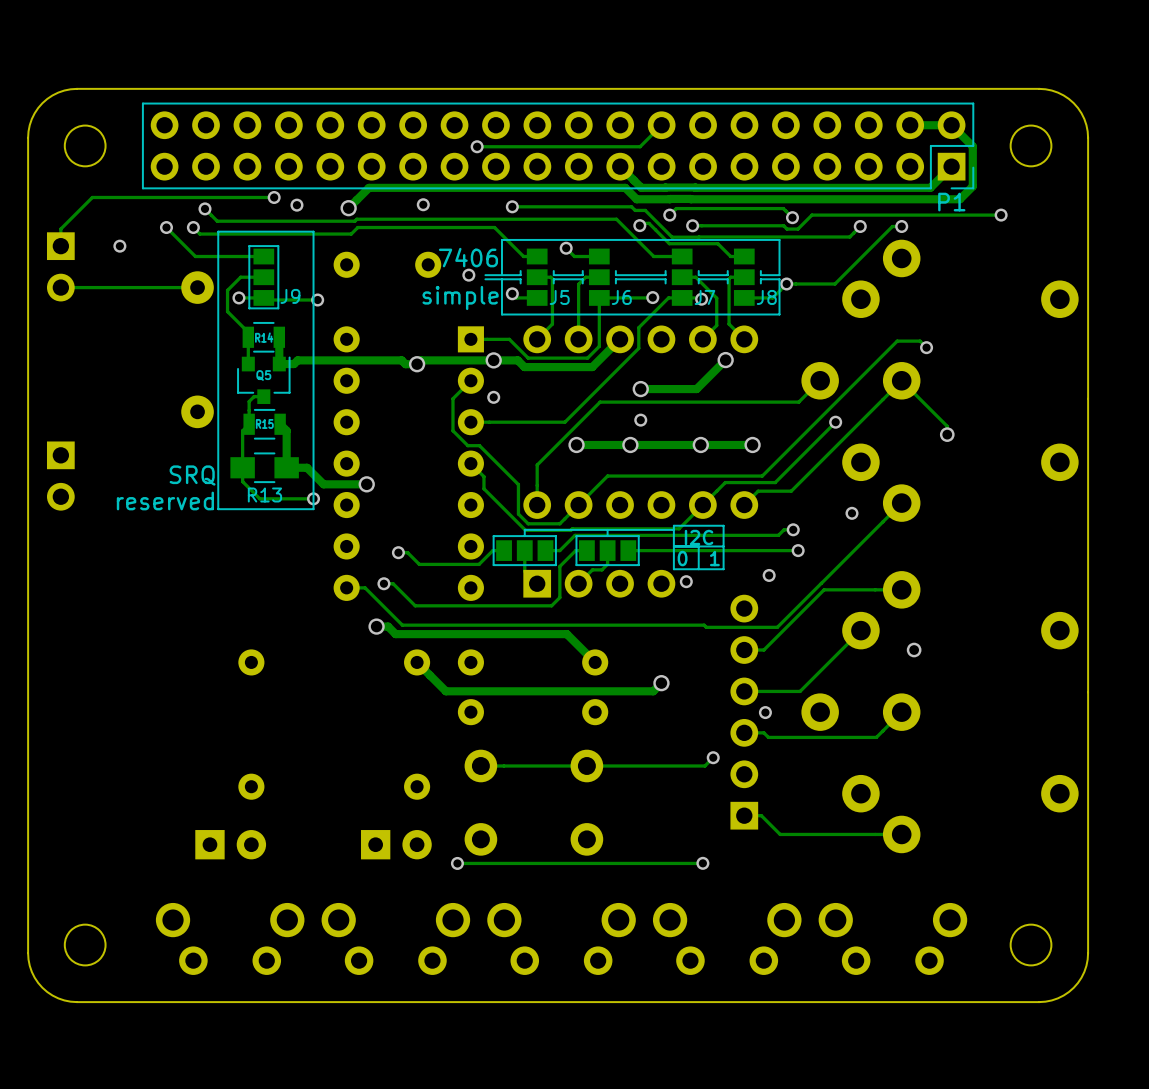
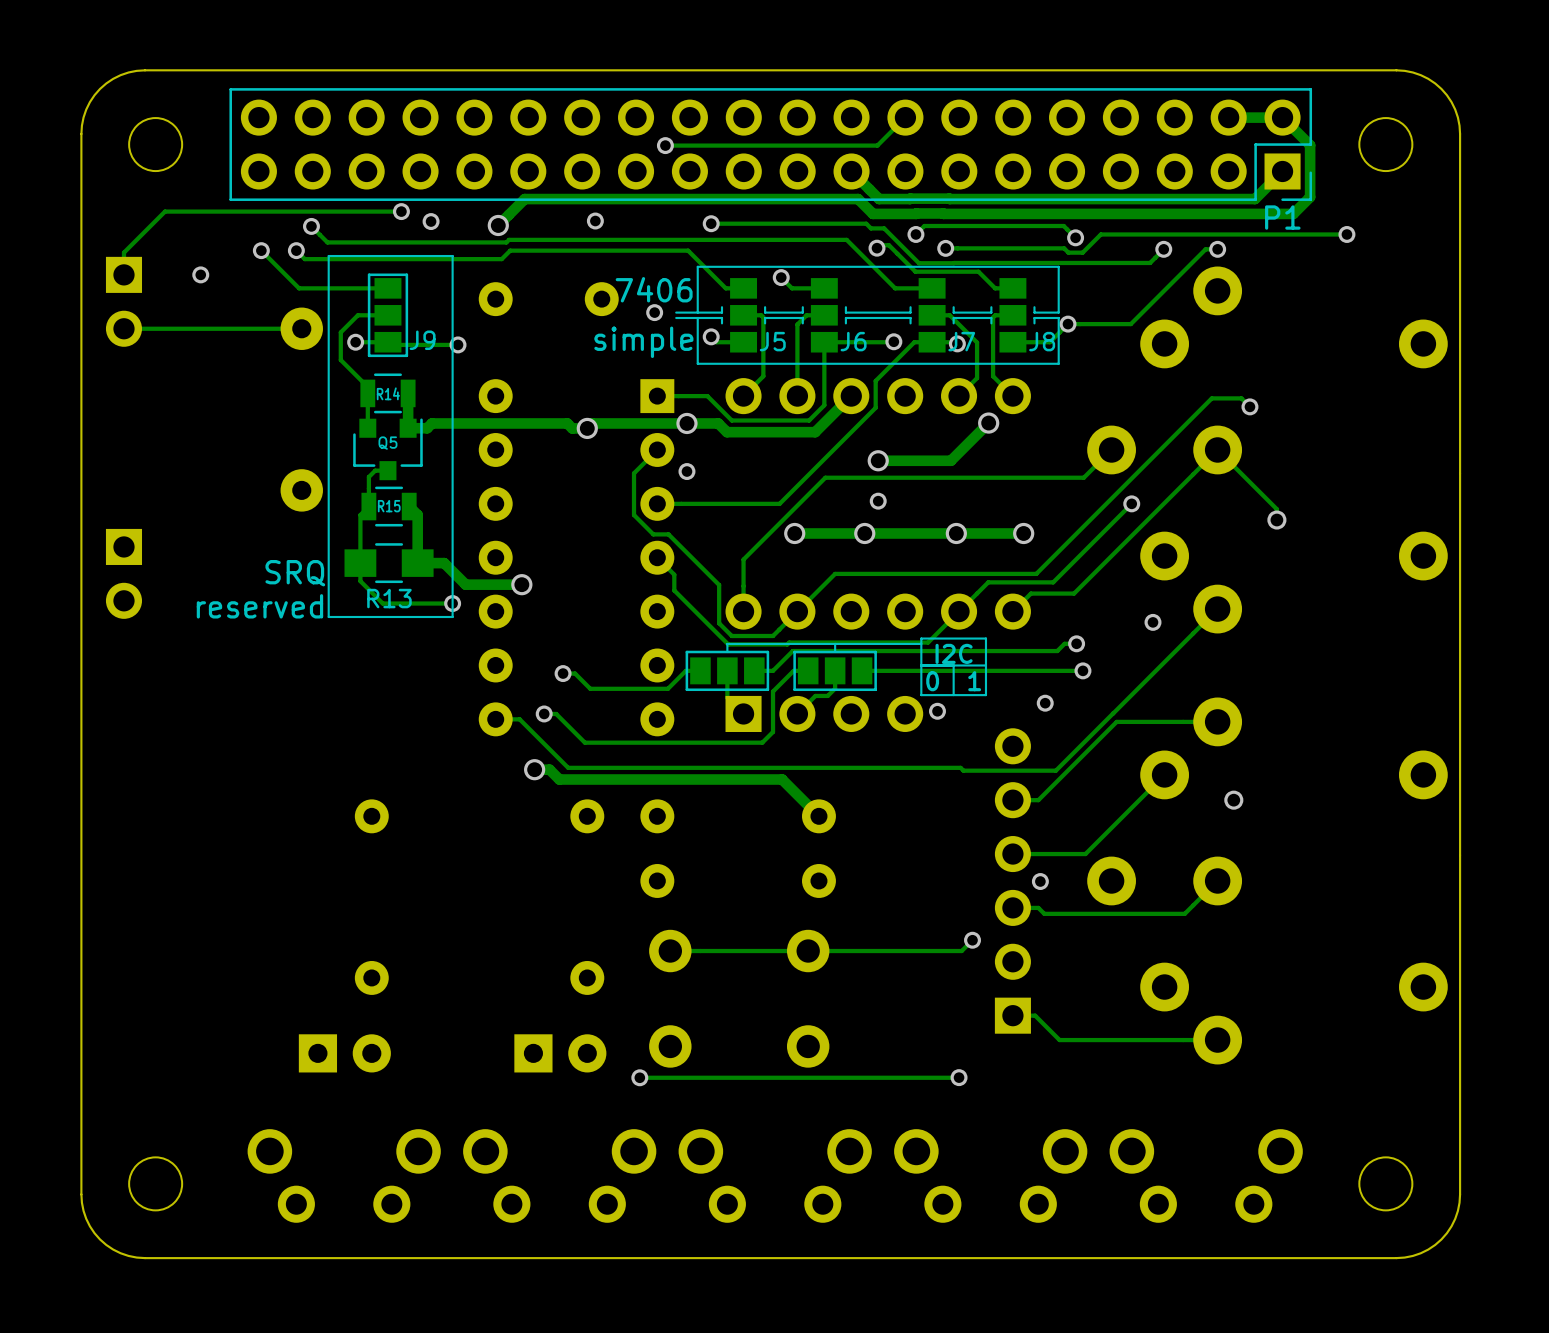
track: (417, 662) (445, 691) (653, 691) (661, 683) -> none
via: (661, 683) -> none

